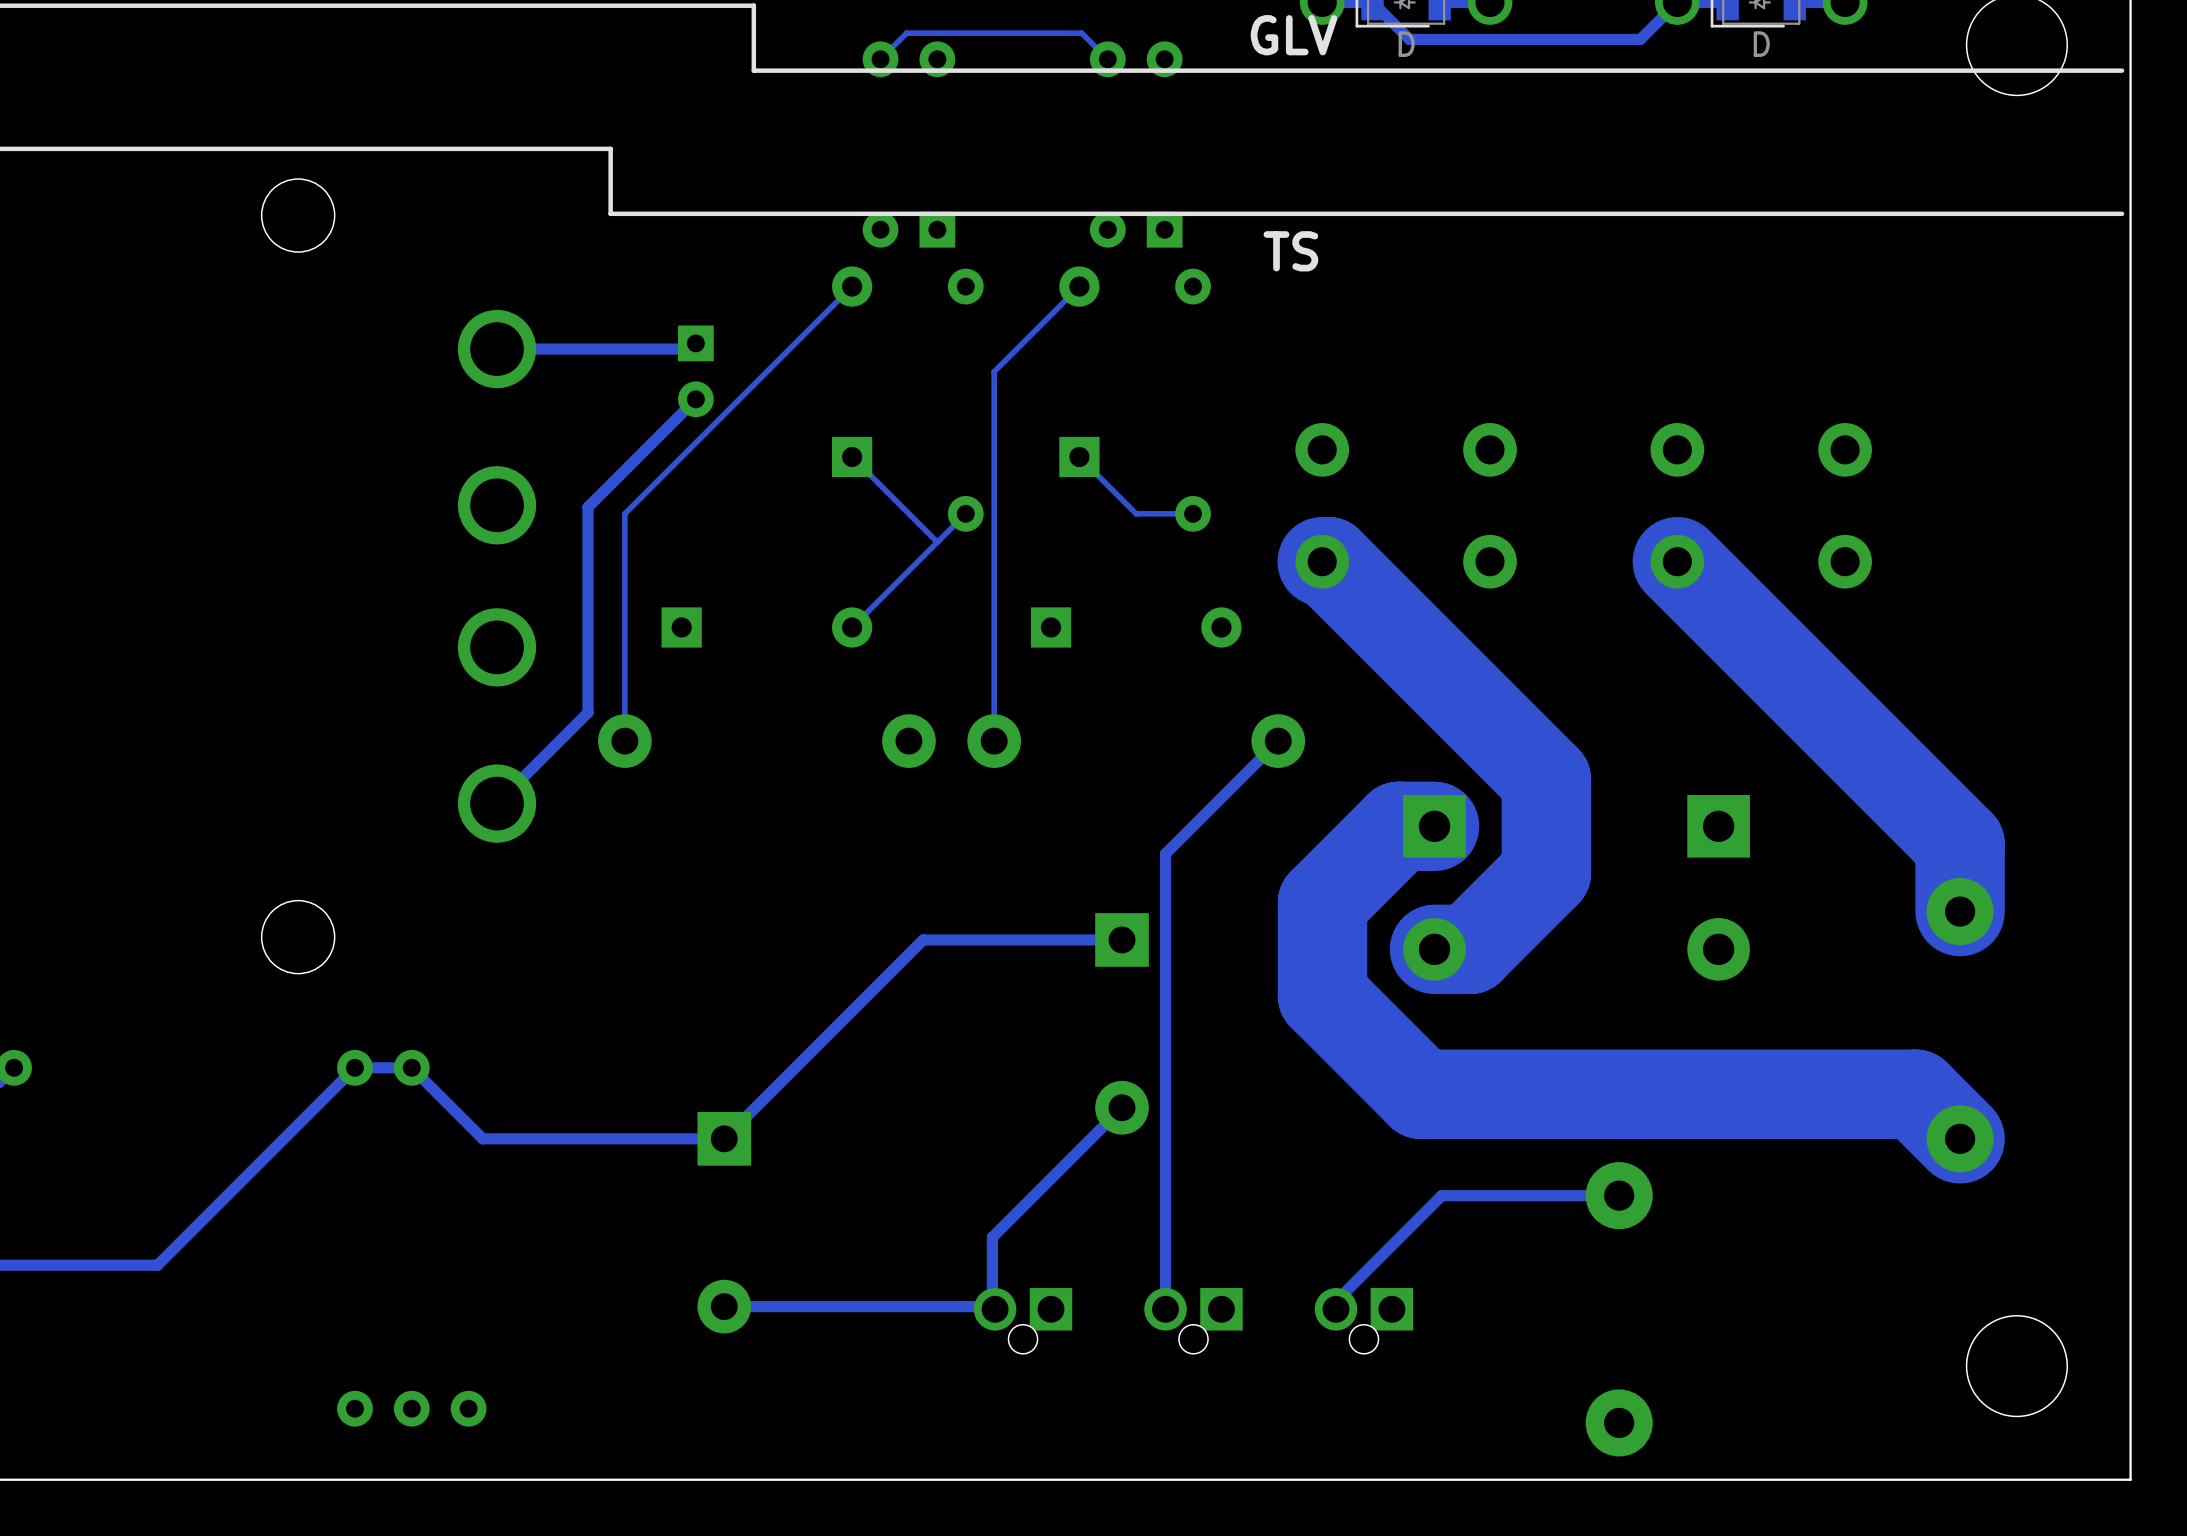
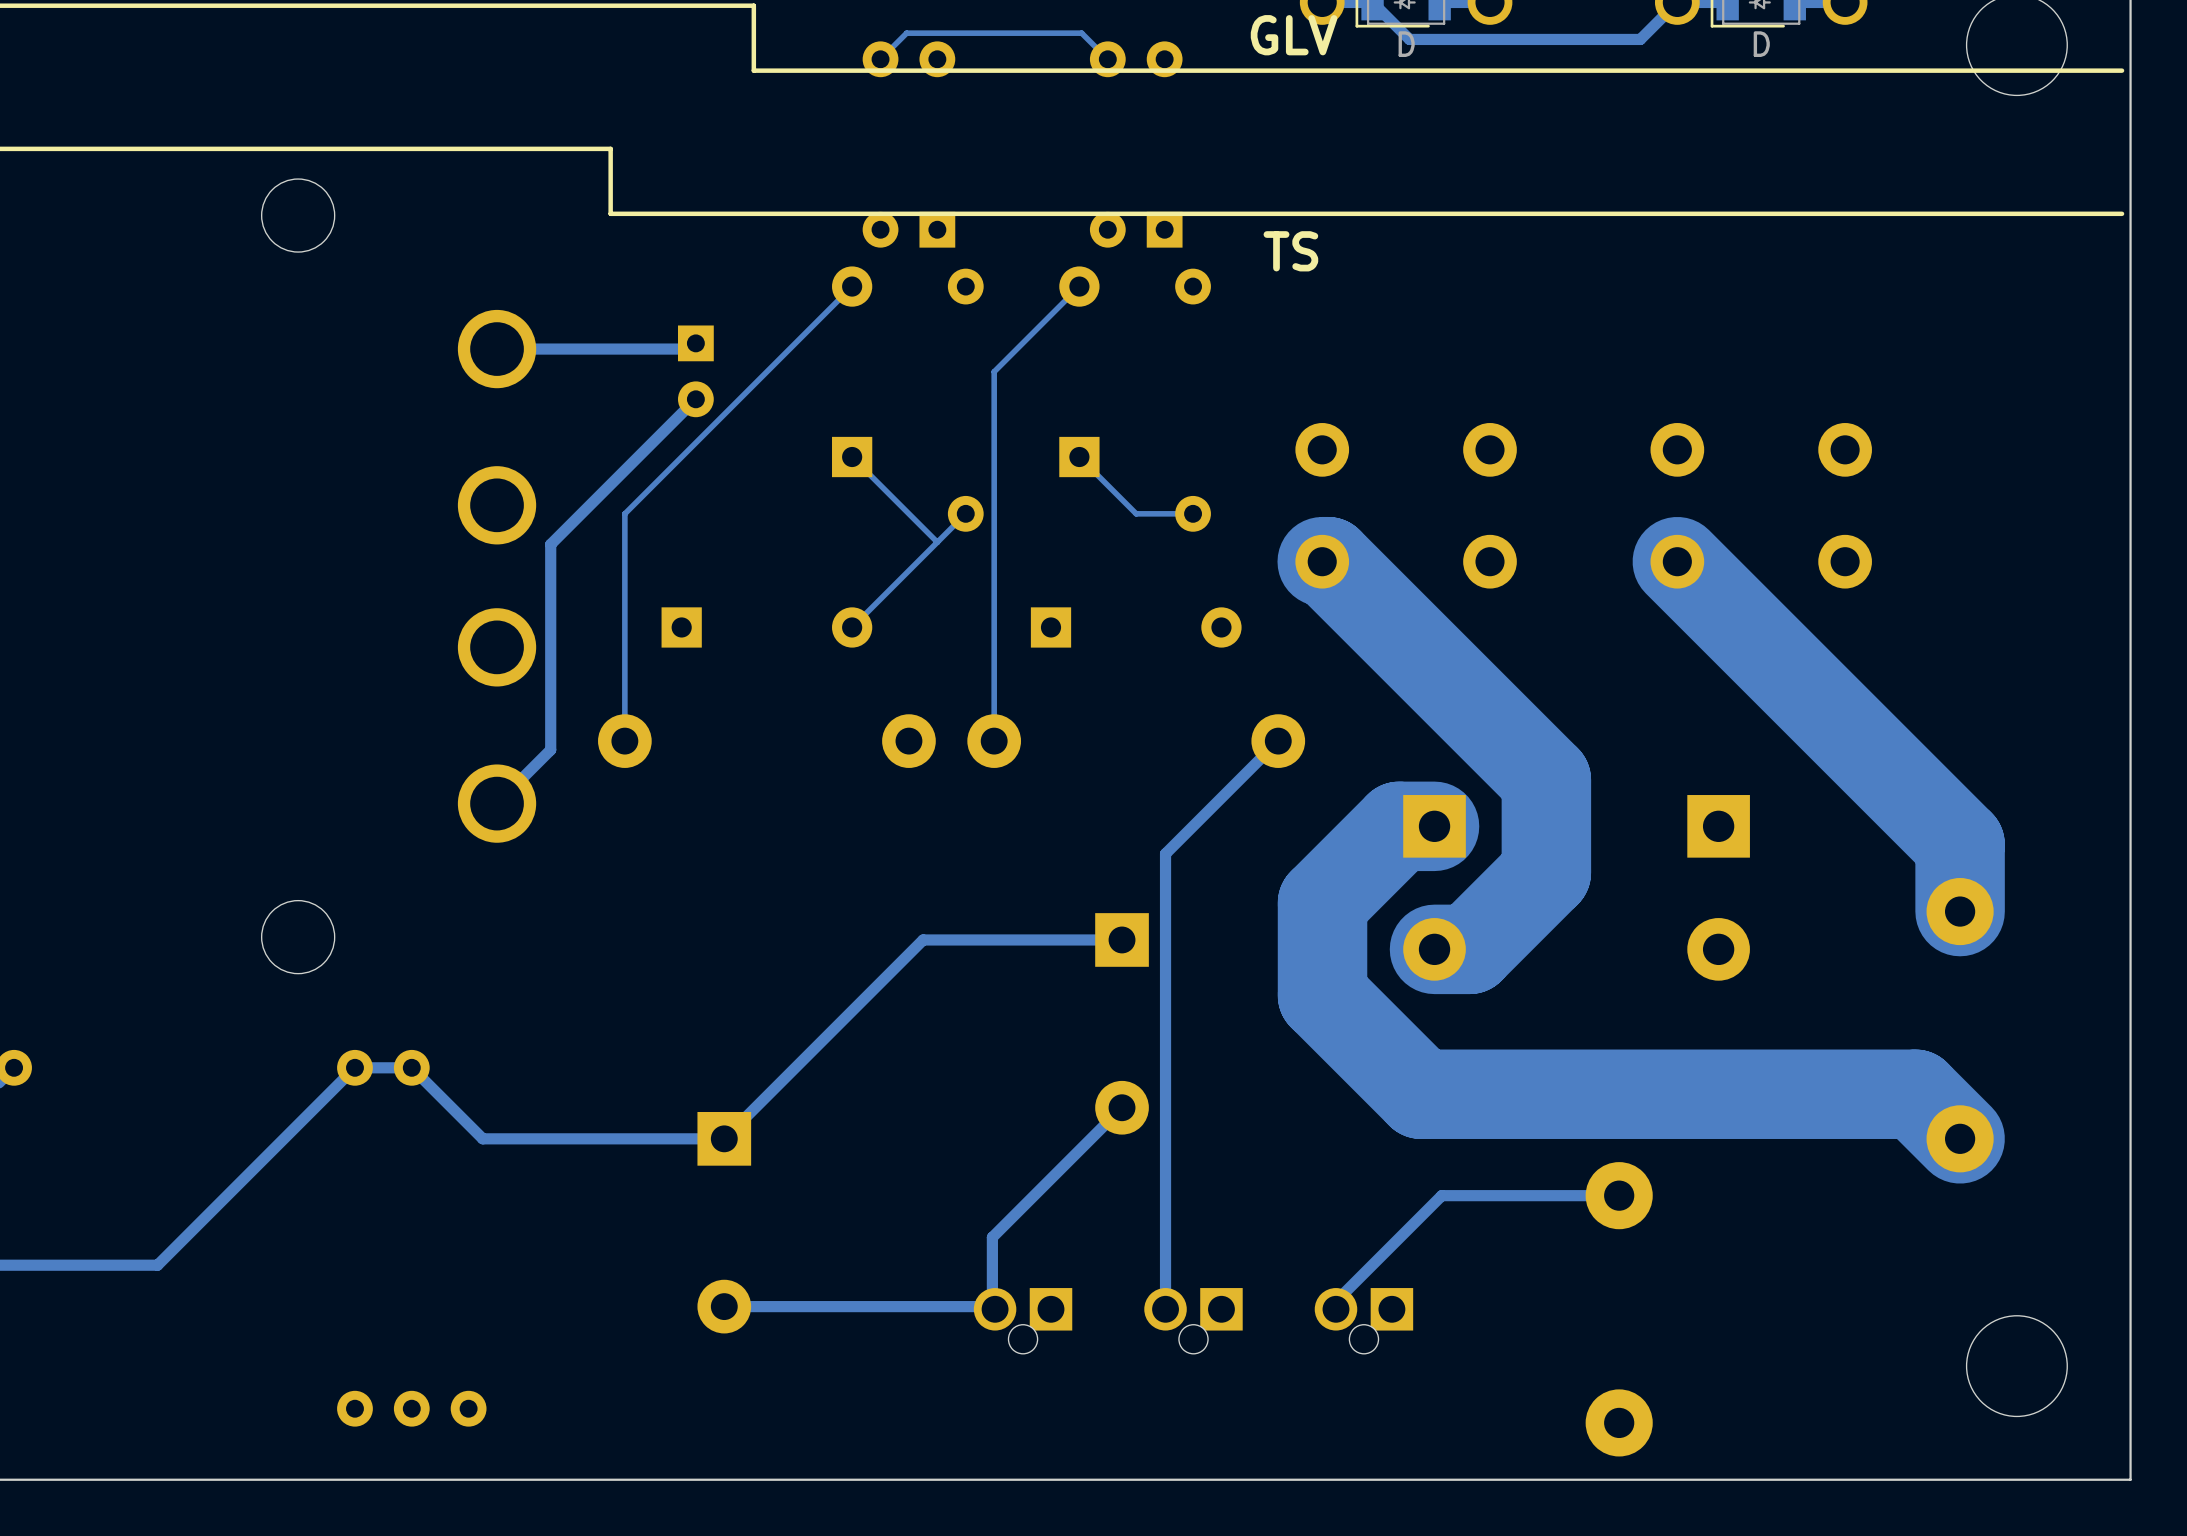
track: (588, 507) (588, 712) (550, 749) -> (588, 507) (550, 544) (550, 749)

